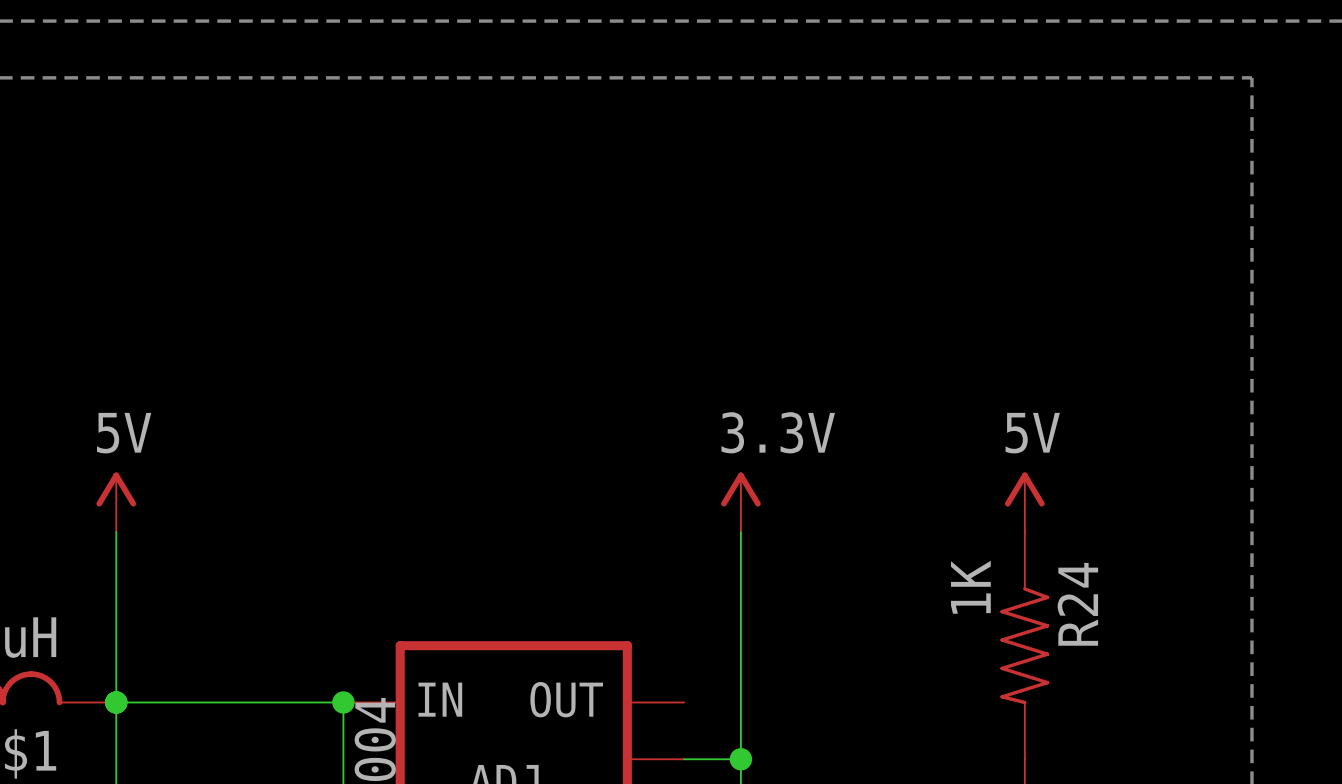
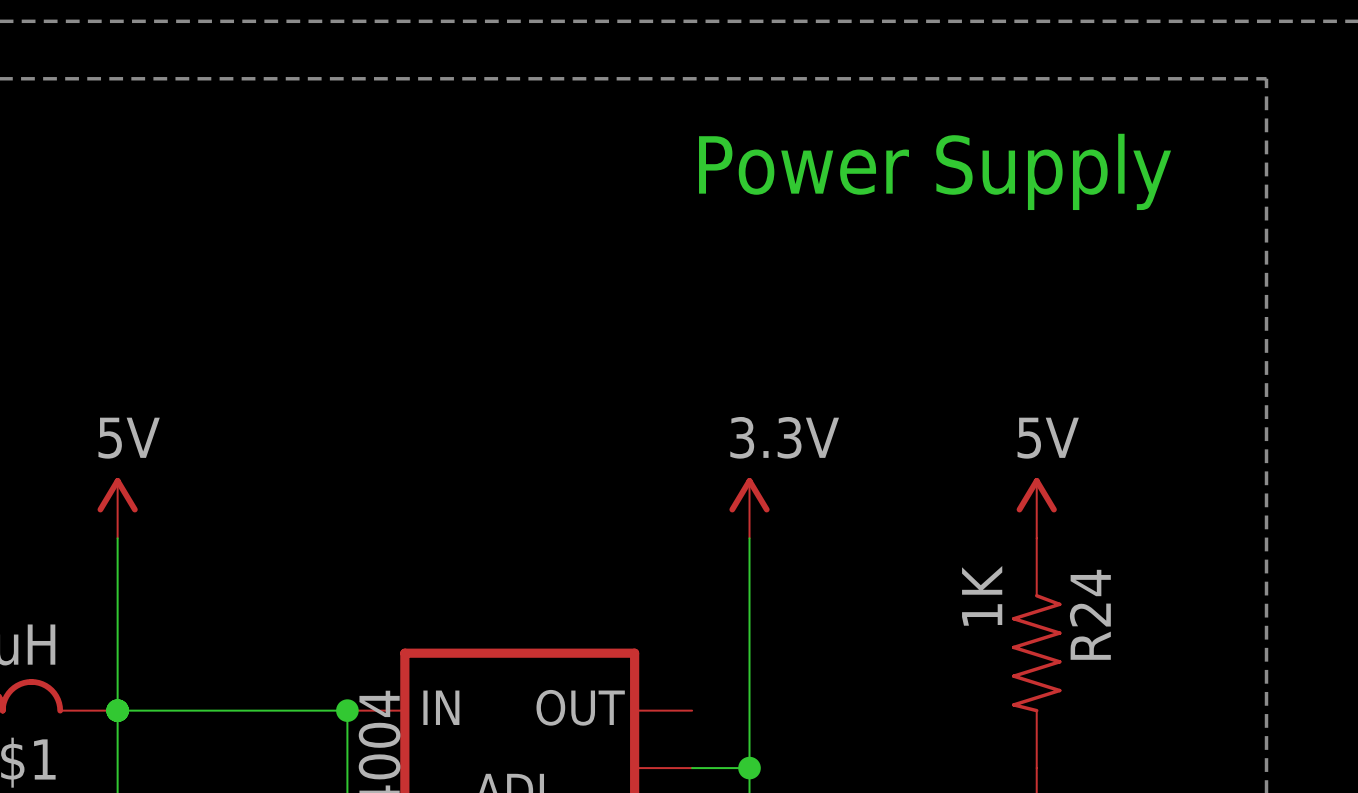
text: none -> Power Supply (935, 171)

